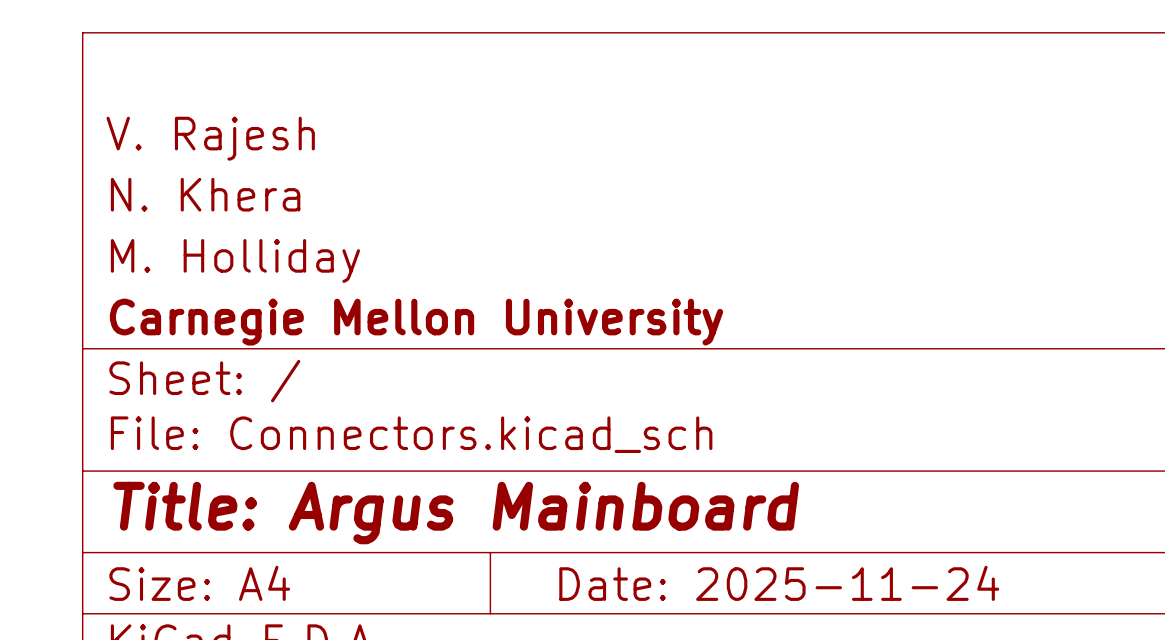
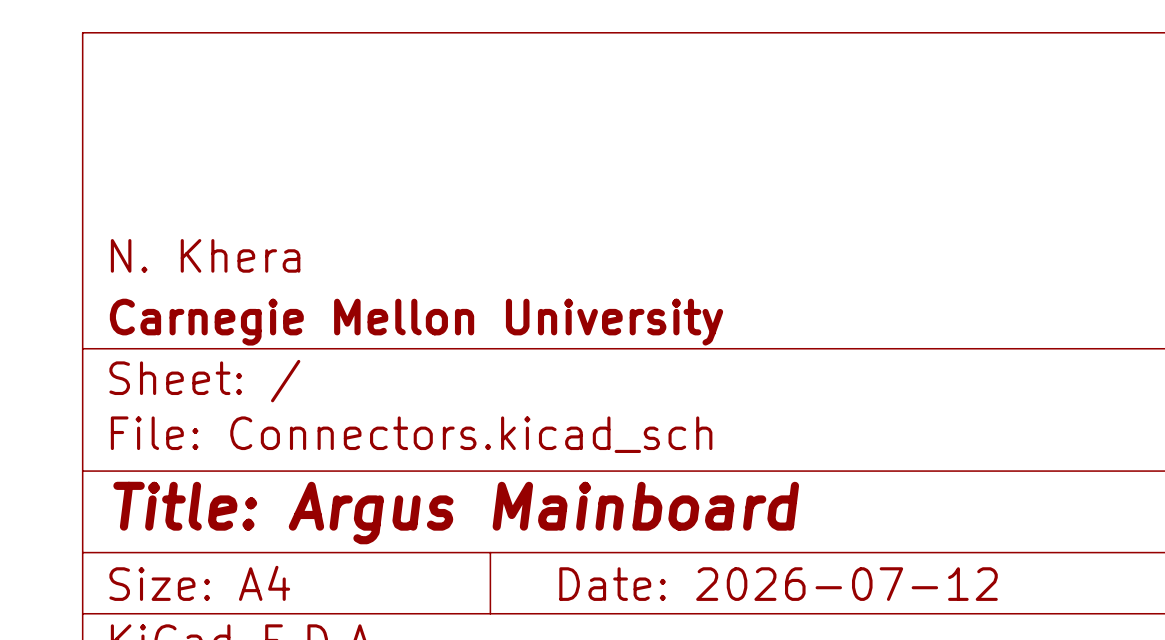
title block: V. Rajesh (210, 138) -> none
title block: N. Khera (205, 194) -> none
title block: M. Holliday (235, 260) -> N. Khera (205, 255)
title block: Date: 2025-11-24 (779, 583) -> Date: 2026-07-12 (778, 584)

